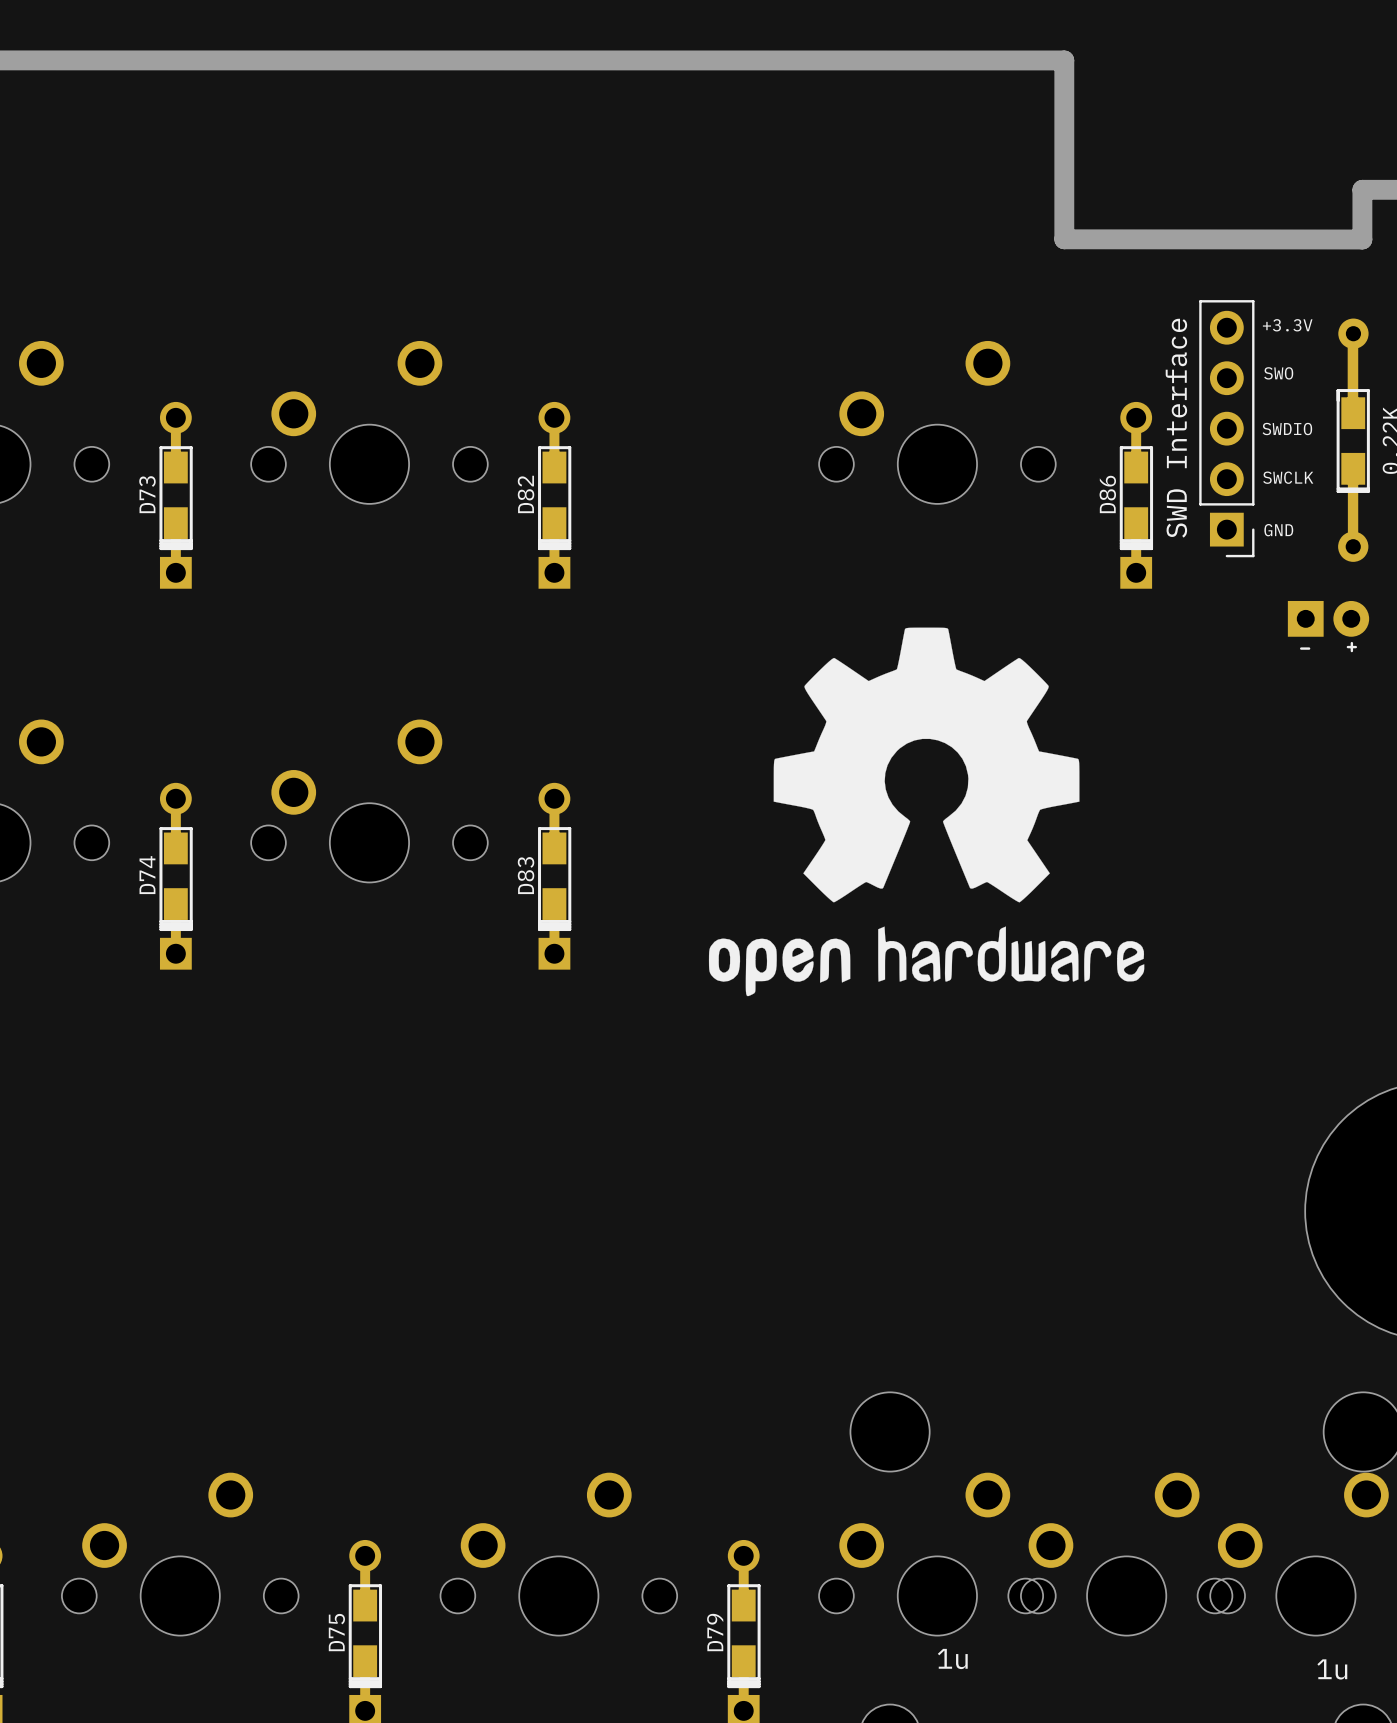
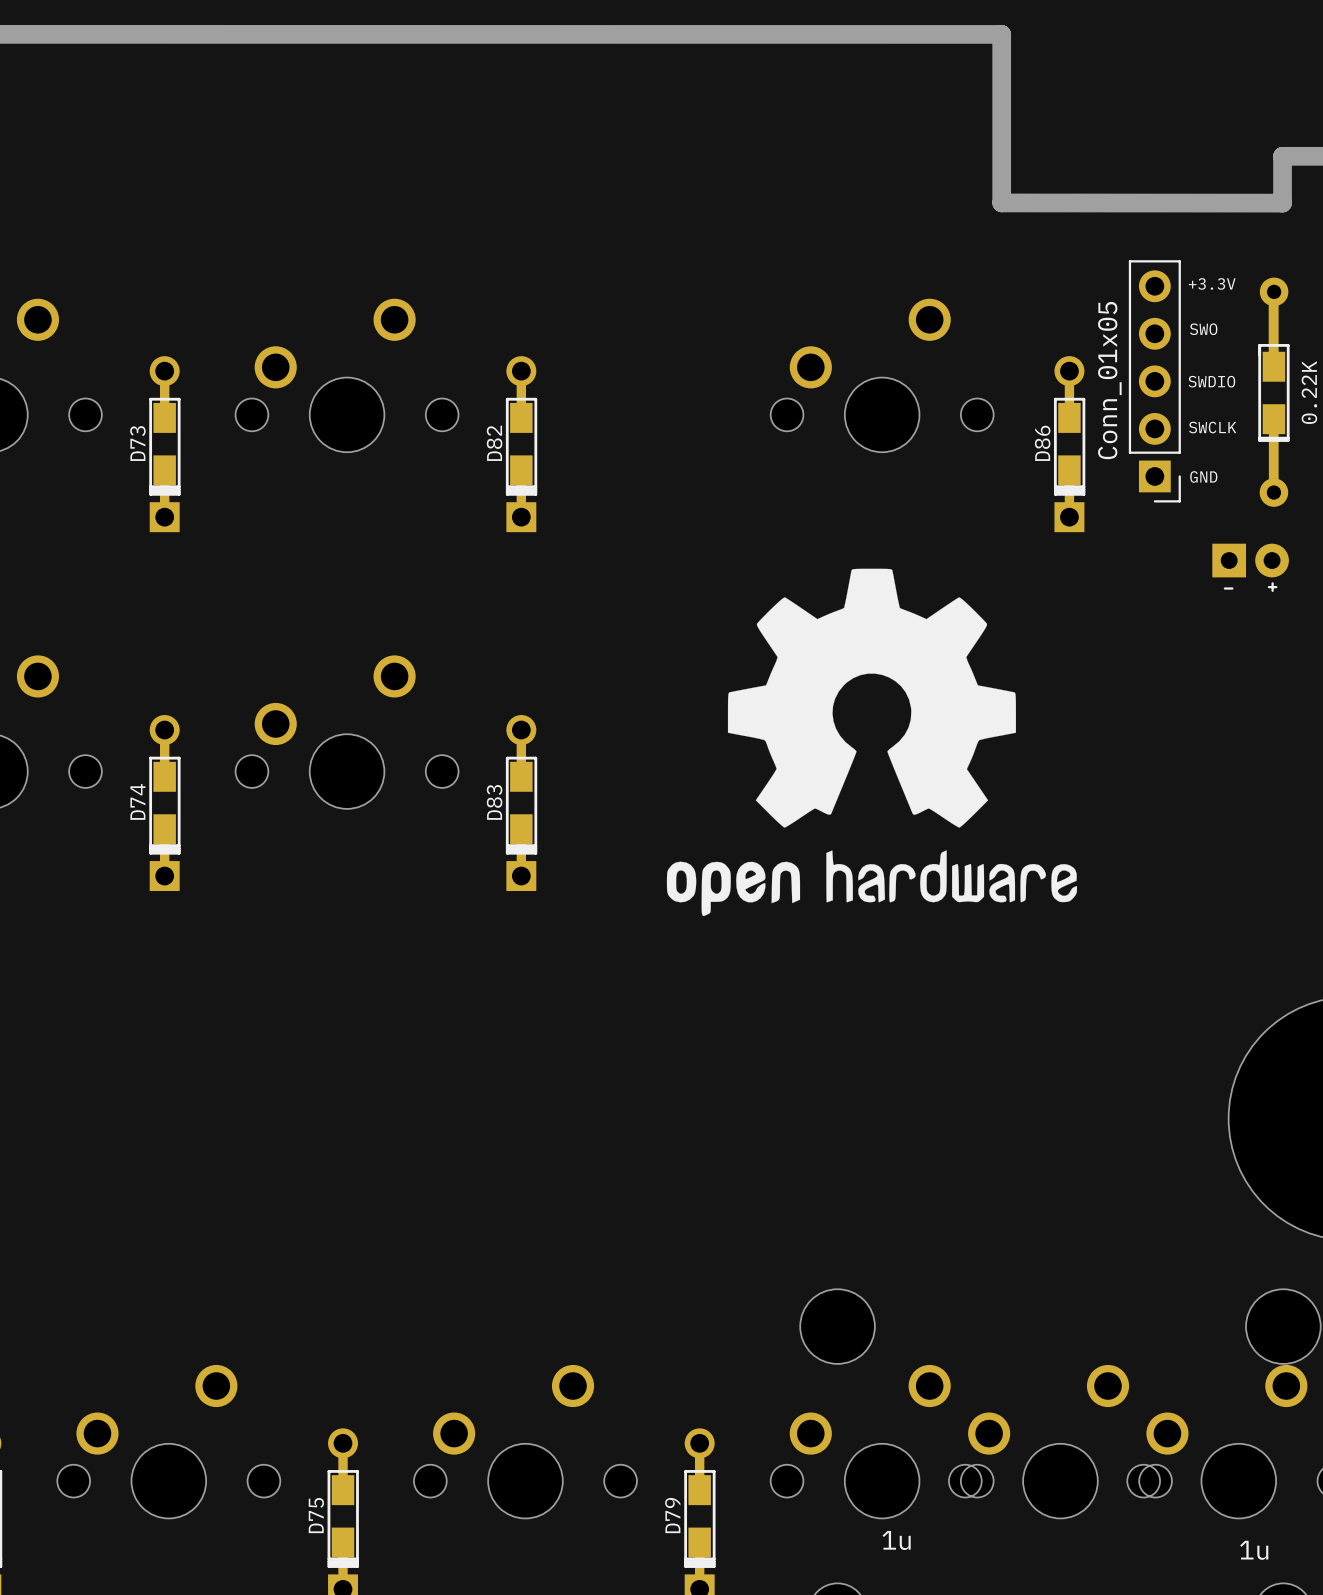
part value: SWD Interface (1176, 428) -> Conn_01x05 (1109, 380)

